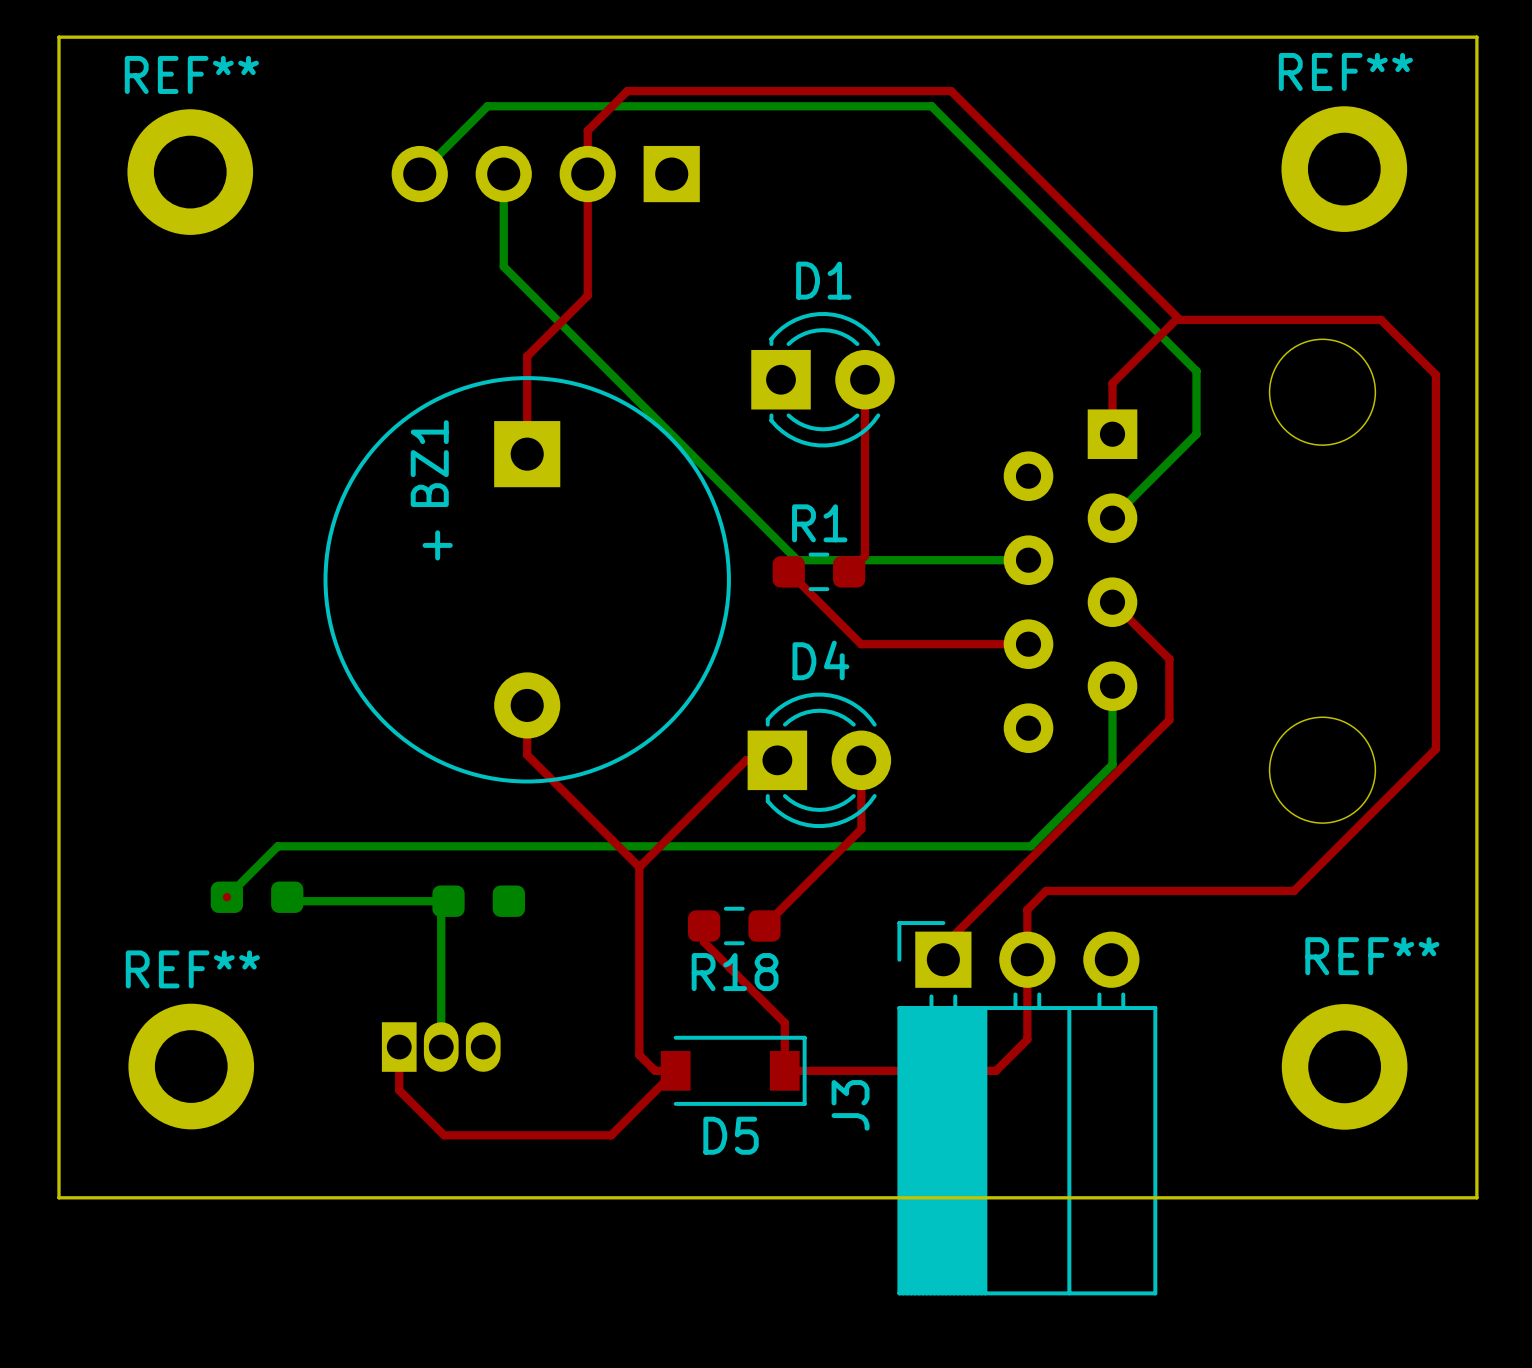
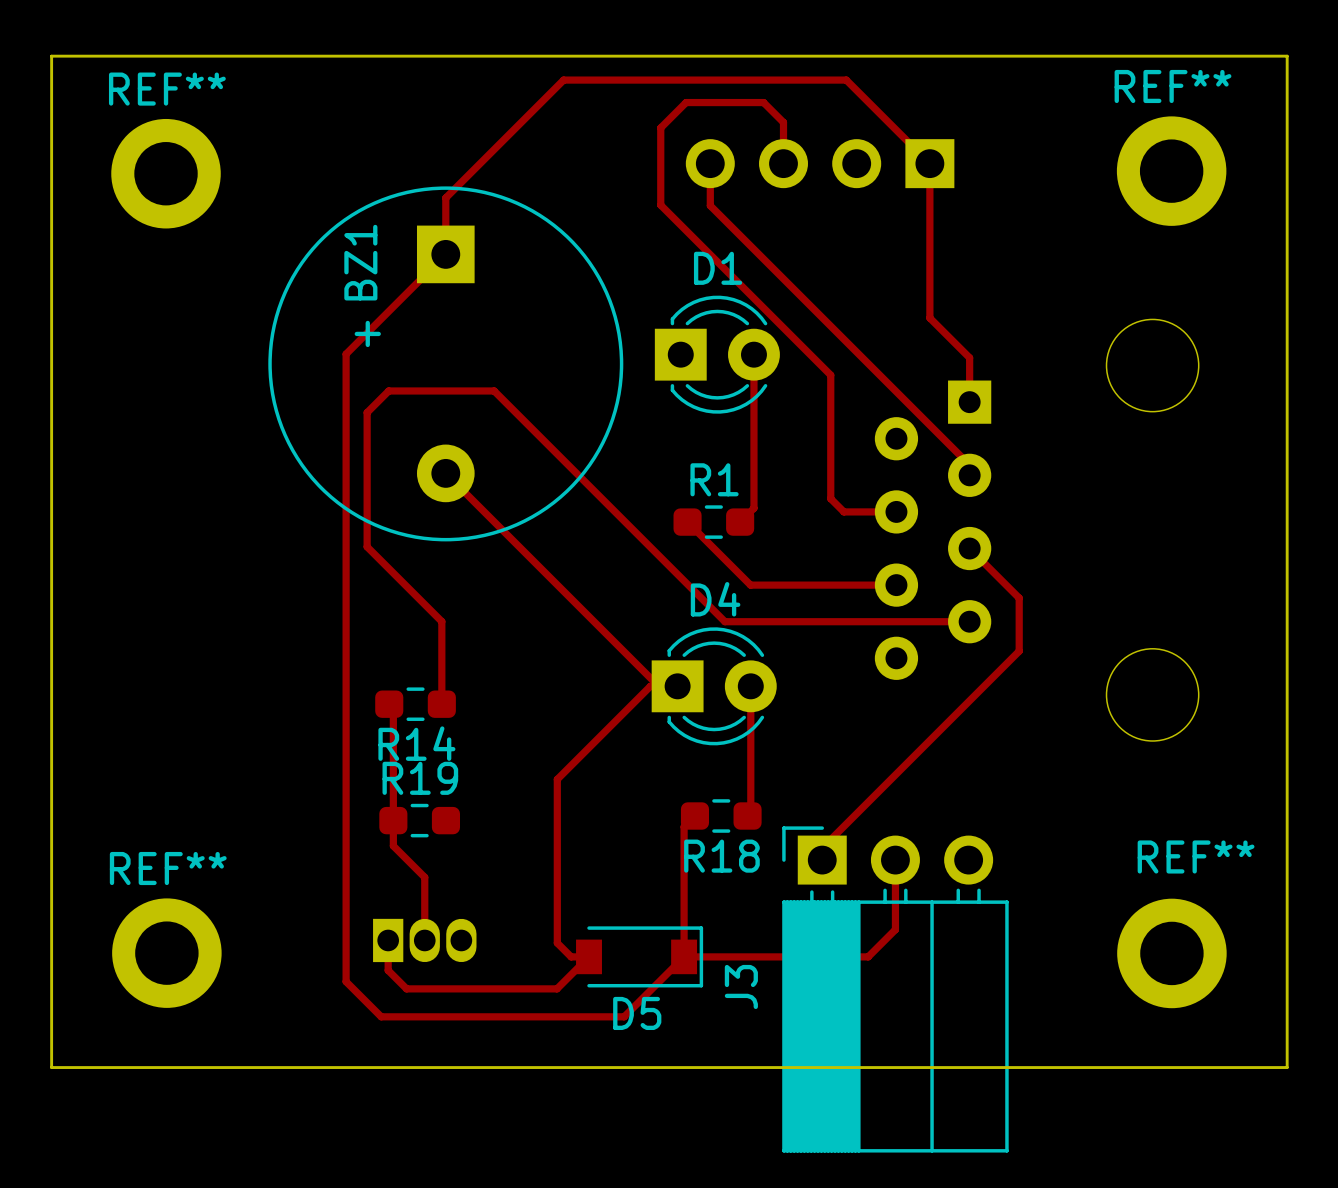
top track: none -> (710, 163) (710, 205) (969, 465) (969, 475)
top track: none -> (783, 163) (783, 122) (763, 102) (686, 102) (660, 127) (660, 205) (830, 375) (830, 498) (843, 511) (896, 511)
bottom track: (419, 174) (487, 106) (931, 106) (1196, 371) (1196, 434) (1112, 518) -> none
bottom track: (503, 174) (503, 266) (797, 560) (1028, 560) -> none
part position: (545, 174) -> (820, 163)
top track: (1179, 319) (951, 91) (627, 91) (587, 130) (587, 295) (527, 356) (527, 454) -> none
top track: (1112, 383) (1175, 319) (1381, 319) (1435, 374) (1435, 749) (1294, 890) (1046, 890) (1027, 909) (1027, 959) -> (969, 357) (929, 318) (929, 163) (846, 80) (563, 80) (445, 197) (445, 254) (346, 354) (346, 981) (381, 1016) (624, 1016) (684, 956)
top track: none -> (445, 473) (658, 686)
BZ1 position: (527, 579) -> (445, 363)
top track: none -> (969, 621) (724, 621) (494, 390) (388, 390) (367, 412) (367, 546) (441, 621) (441, 704)
bottom track: (1112, 686) (1112, 764) (1030, 846) (277, 846) (226, 897) -> none
top track: (527, 705) (527, 755) (639, 867) -> none
top track: none -> (389, 704) (393, 708) (393, 845) (424, 877) (424, 940)
top track: (861, 829) (764, 926) -> (750, 746) (750, 812) (747, 815)
R14 side: bottom (257, 897) -> top (415, 704)
bottom track: (287, 897) (291, 901) (448, 901) (441, 908) (441, 1047) -> none
R19 side: bottom (478, 901) -> top (419, 820)
top track: (704, 926) (704, 942) (784, 1022) -> (694, 815) (684, 826) (684, 915)
R18 position: (734, 926) -> (721, 815)
top track: (399, 1047) (399, 1090) (444, 1135) (611, 1135) (638, 1107) -> (388, 940) (388, 970) (406, 988) (557, 988)
part position: (441, 1047) -> (424, 940)

